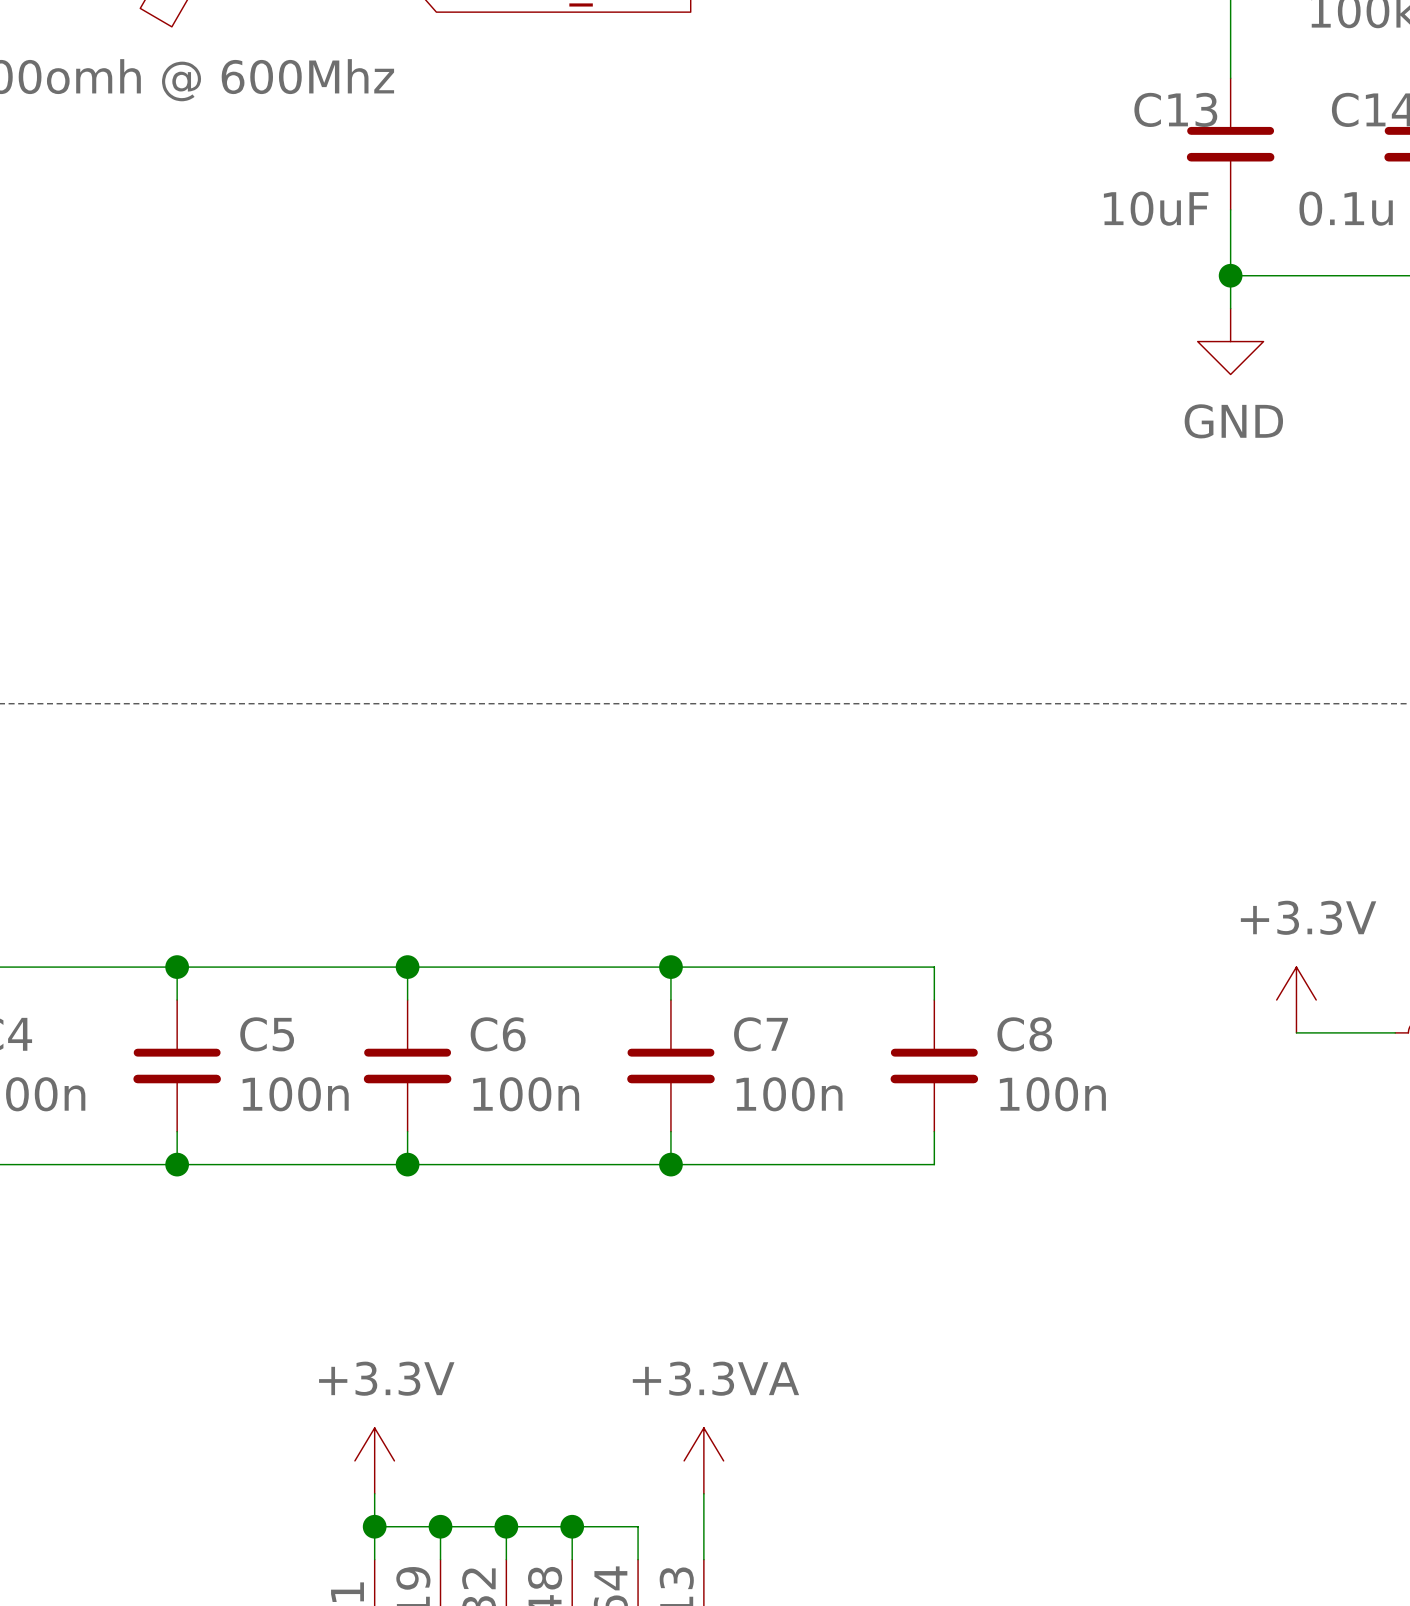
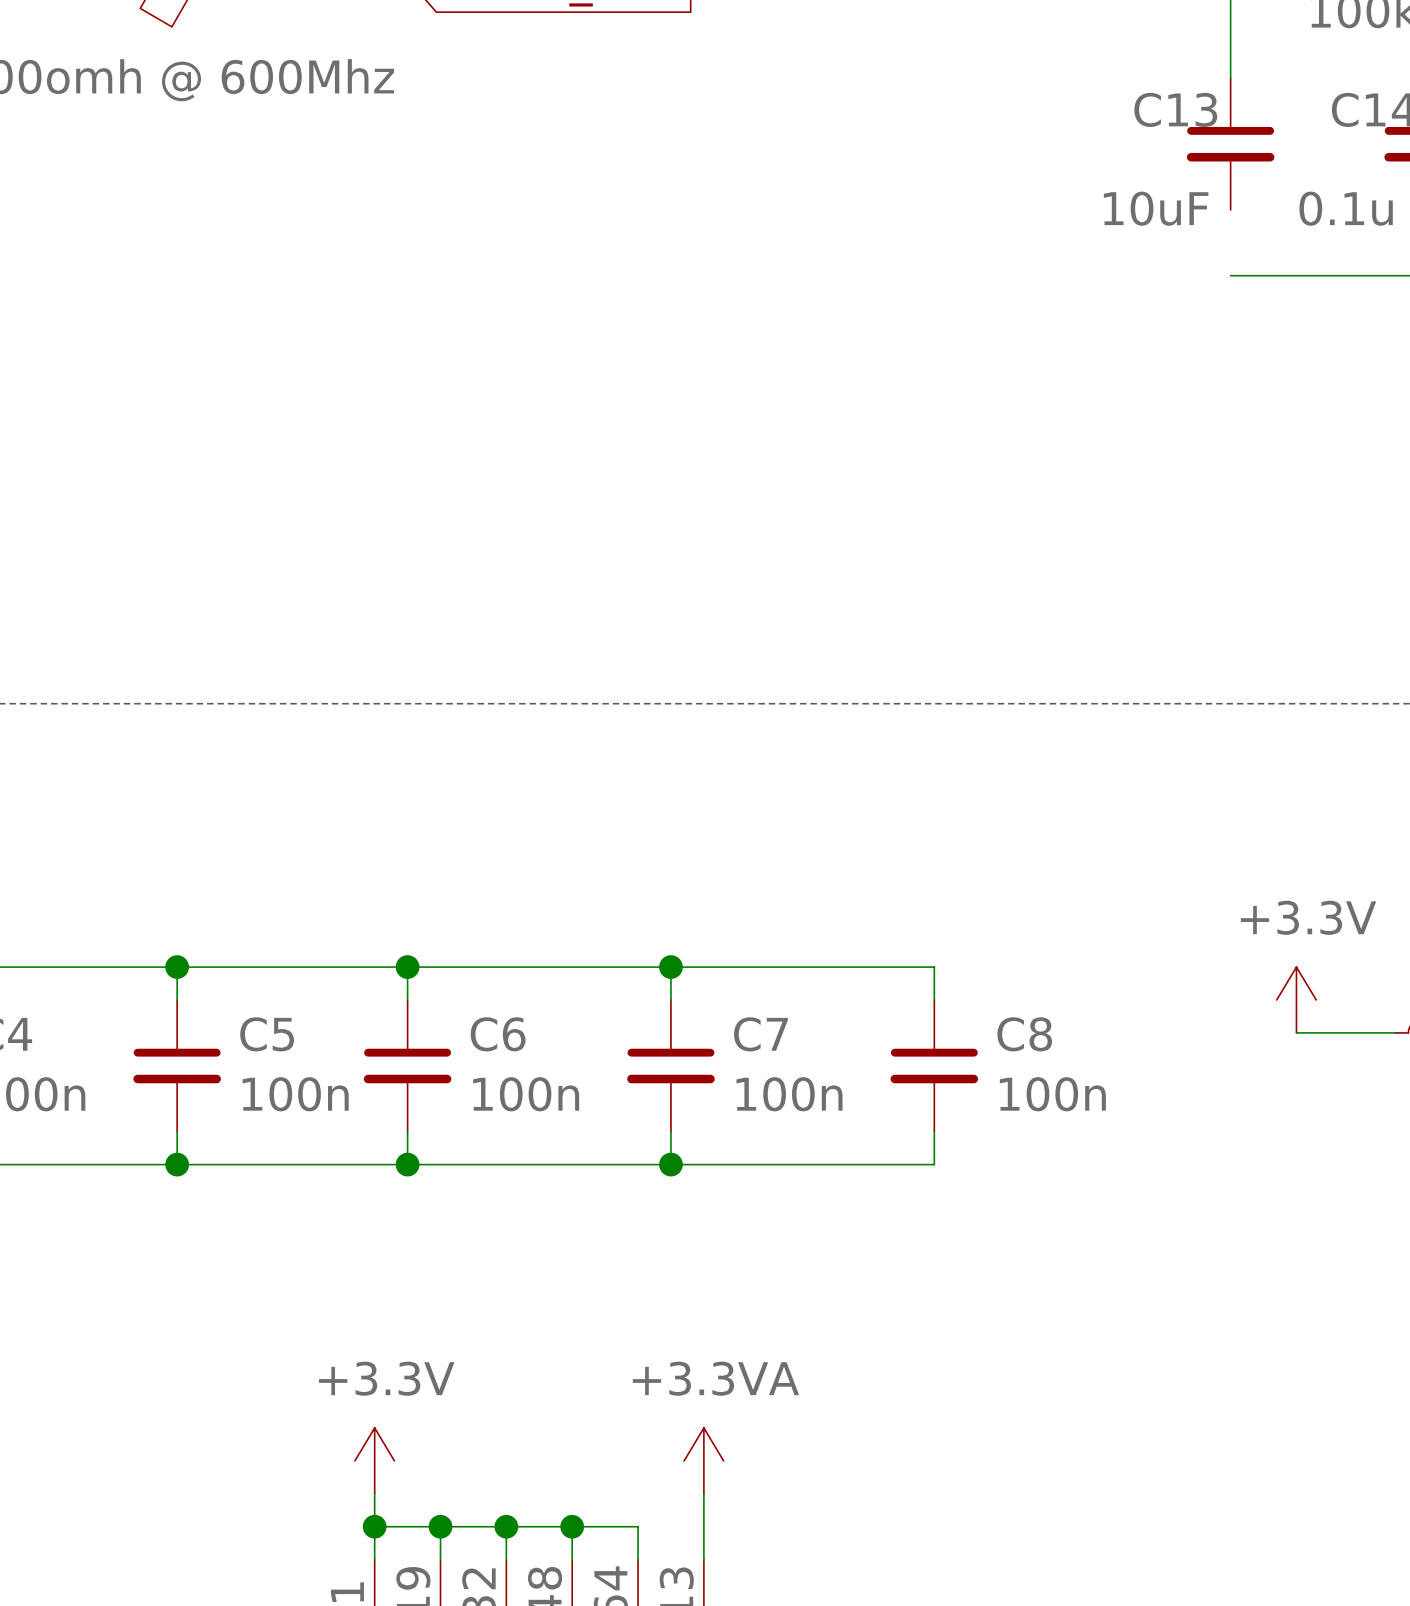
wire: (1230, 209) (1230, 308) -> none
junction: (1230, 275) -> none
power symbol: GND (1230, 341) -> none

